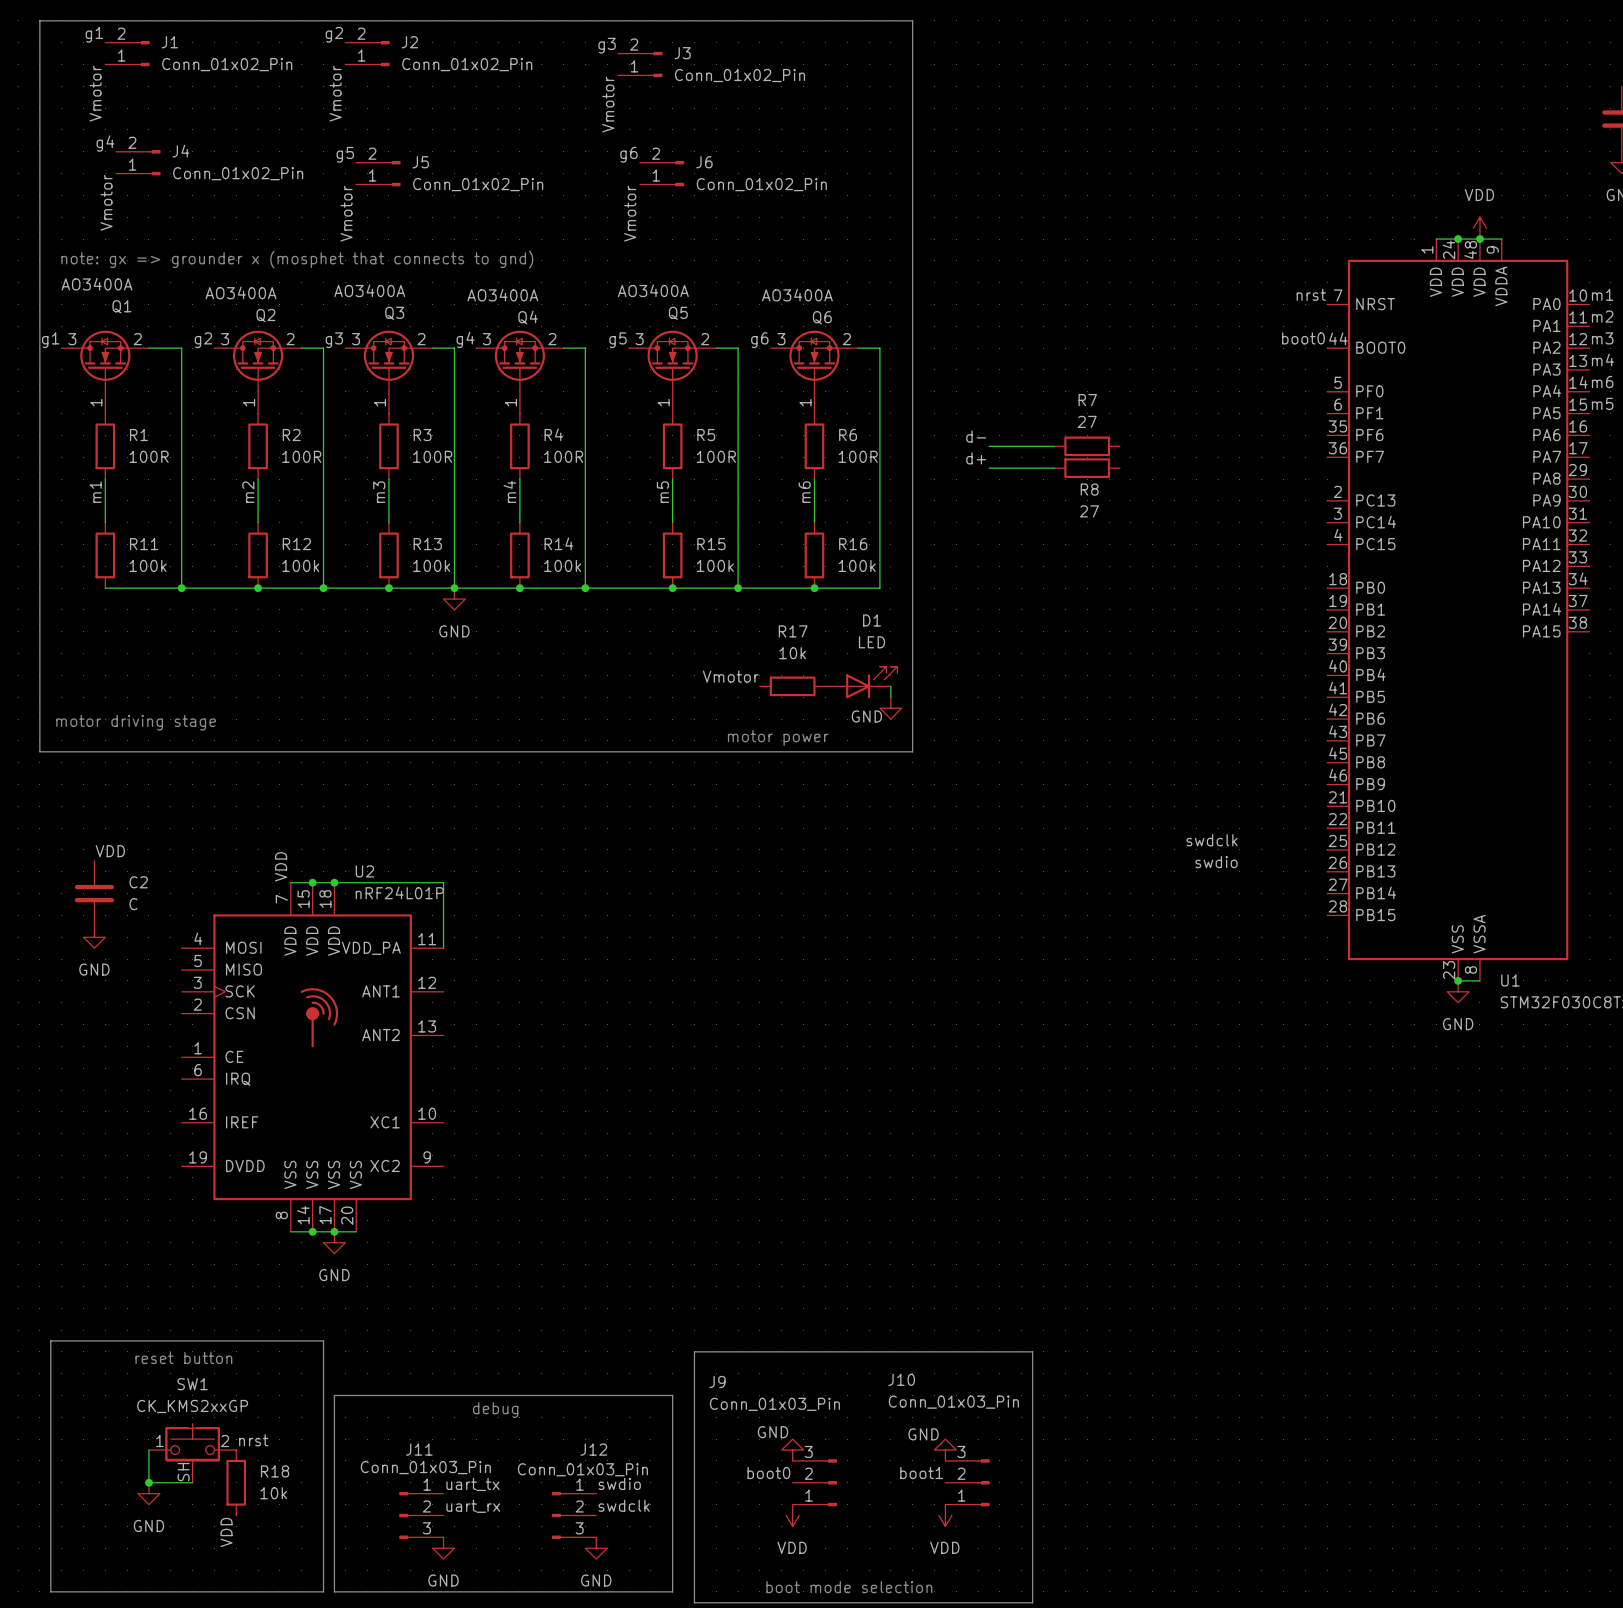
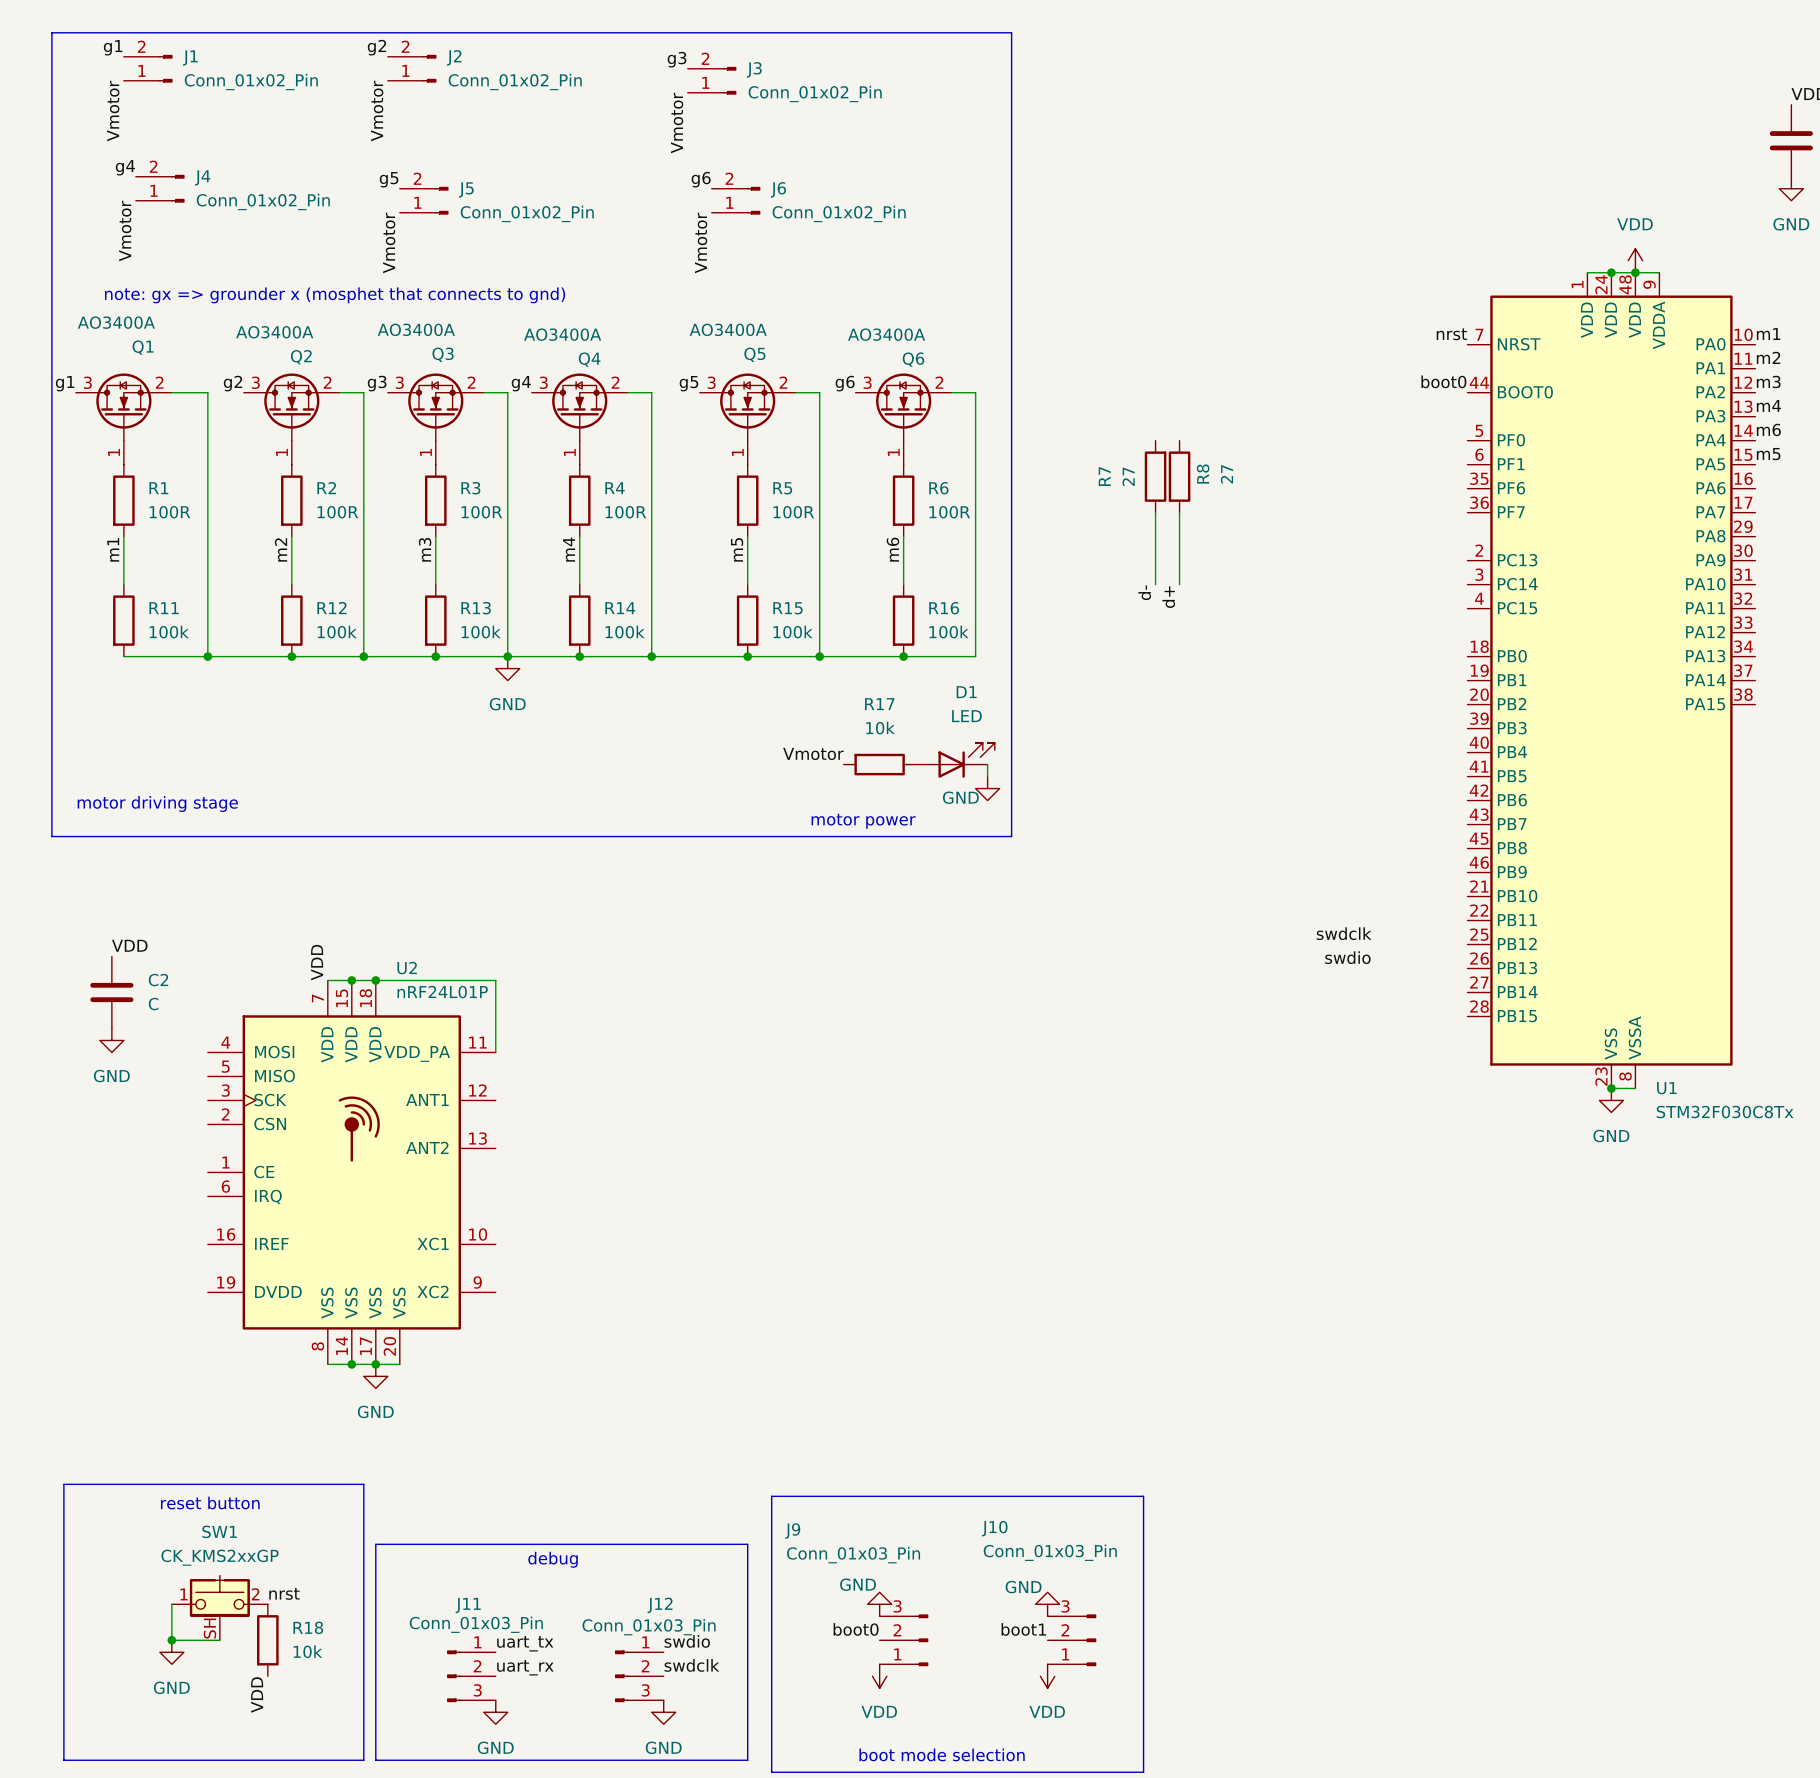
R7 name position: R7 (1087, 400) -> R7 (1104, 476)
R7 value position: 27 (1087, 421) -> 27 (1128, 476)
label rotation: 0° (976, 436) -> 90° counterclockwise (1144, 592)
label position: d- (976, 436) -> d- (1144, 592)
wire: (989, 446) (1054, 446) -> none
R7 rotation: 0° (1087, 446) -> 90° clockwise (1155, 476)
R7 position: (1087, 446) -> (1155, 476)
wire: none -> (1155, 512) (1155, 584)
wire: none -> (1179, 512) (1179, 584)
label rotation: 0° (976, 458) -> 90° counterclockwise (1168, 597)
label position: d+ (976, 458) -> d+ (1168, 597)
wire: (989, 468) (1054, 468) -> none
R8 rotation: 0° (1087, 468) -> 90° clockwise (1179, 476)
R8 position: (1087, 468) -> (1179, 476)
R8 name position: R8 (1089, 489) -> R8 (1203, 474)
R8 value position: 27 (1089, 511) -> 27 (1226, 474)

